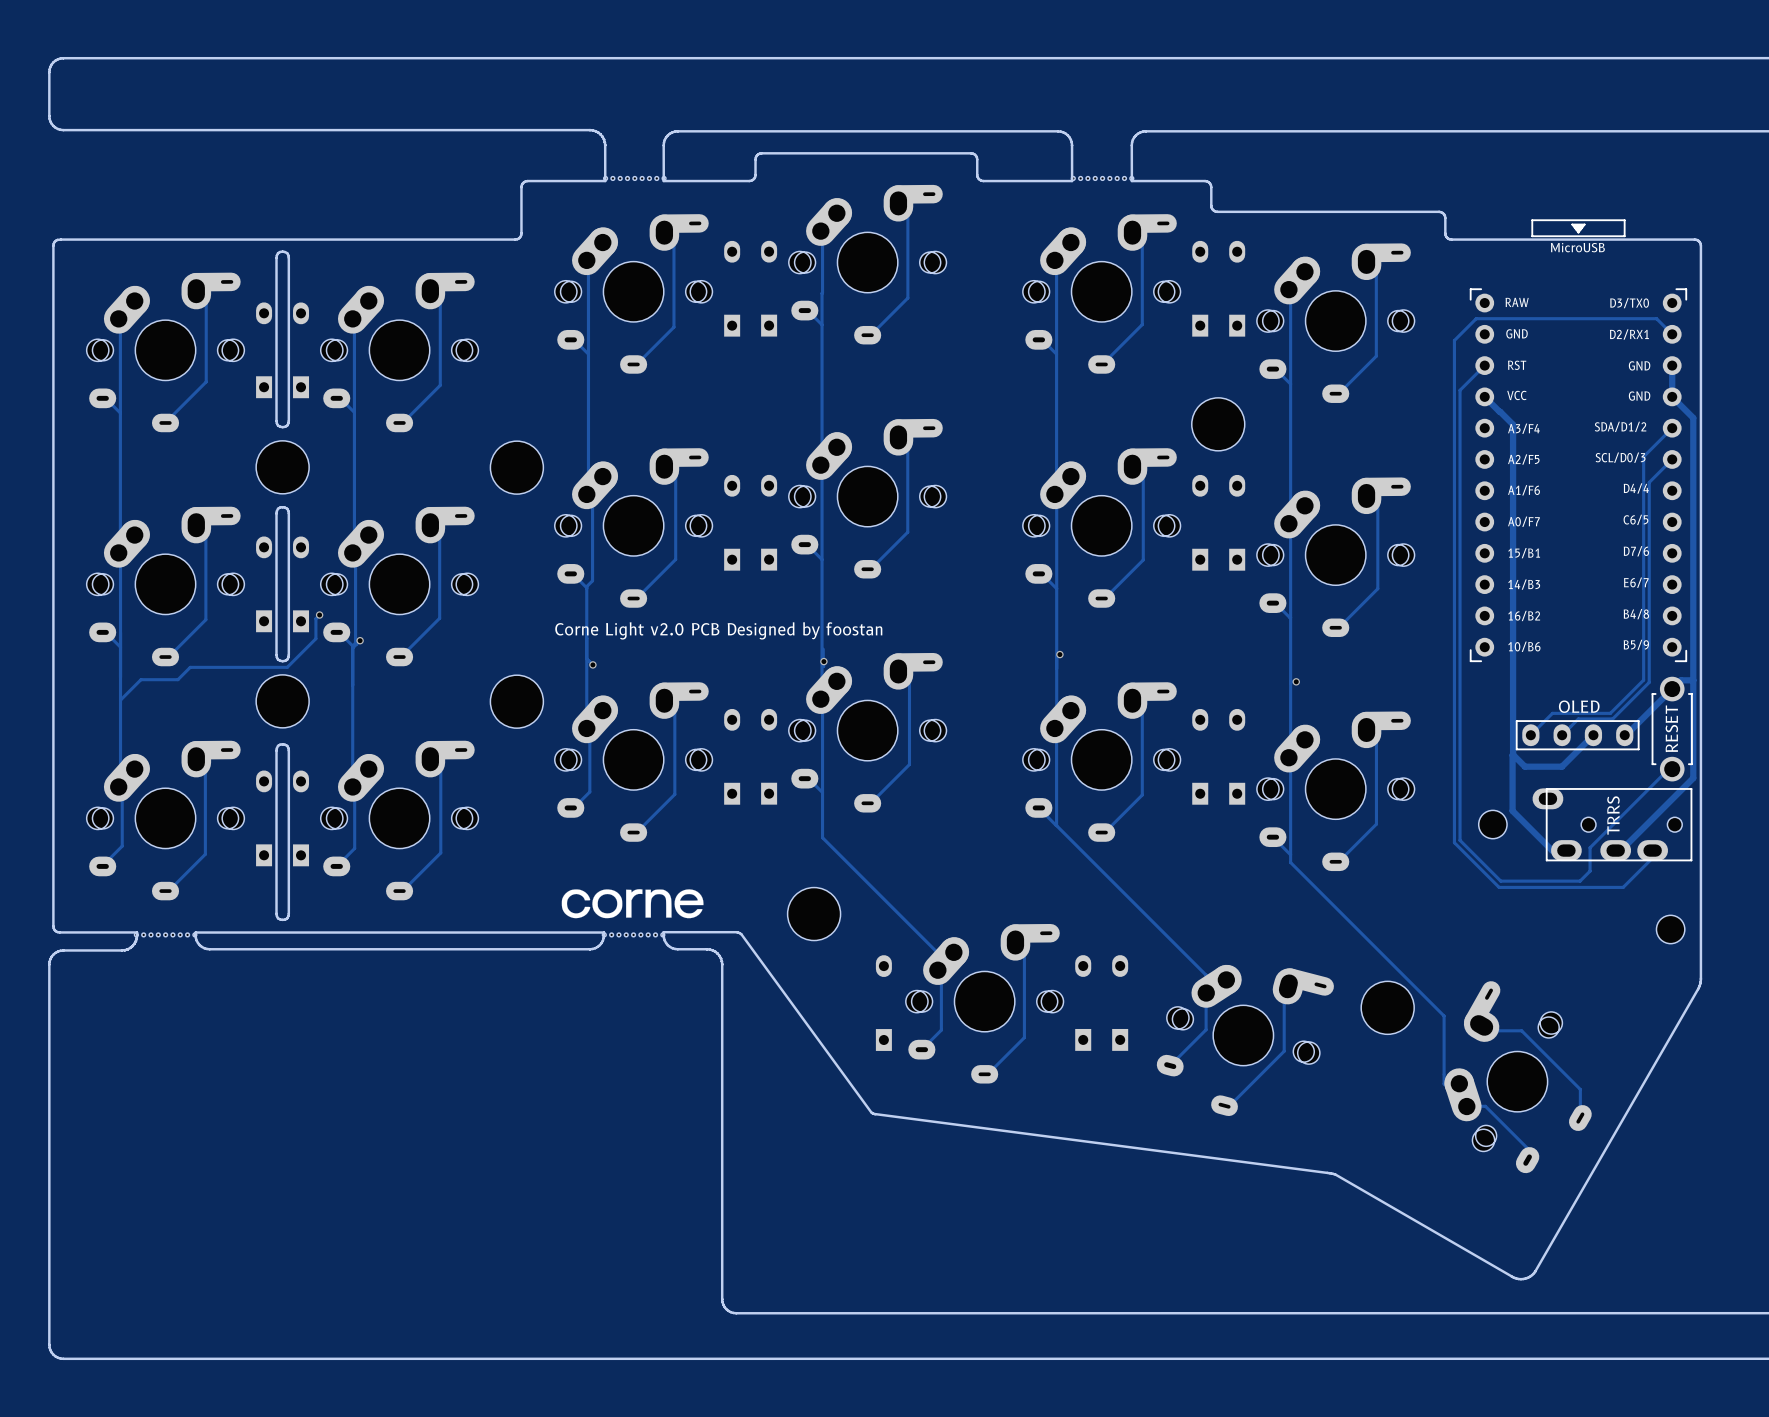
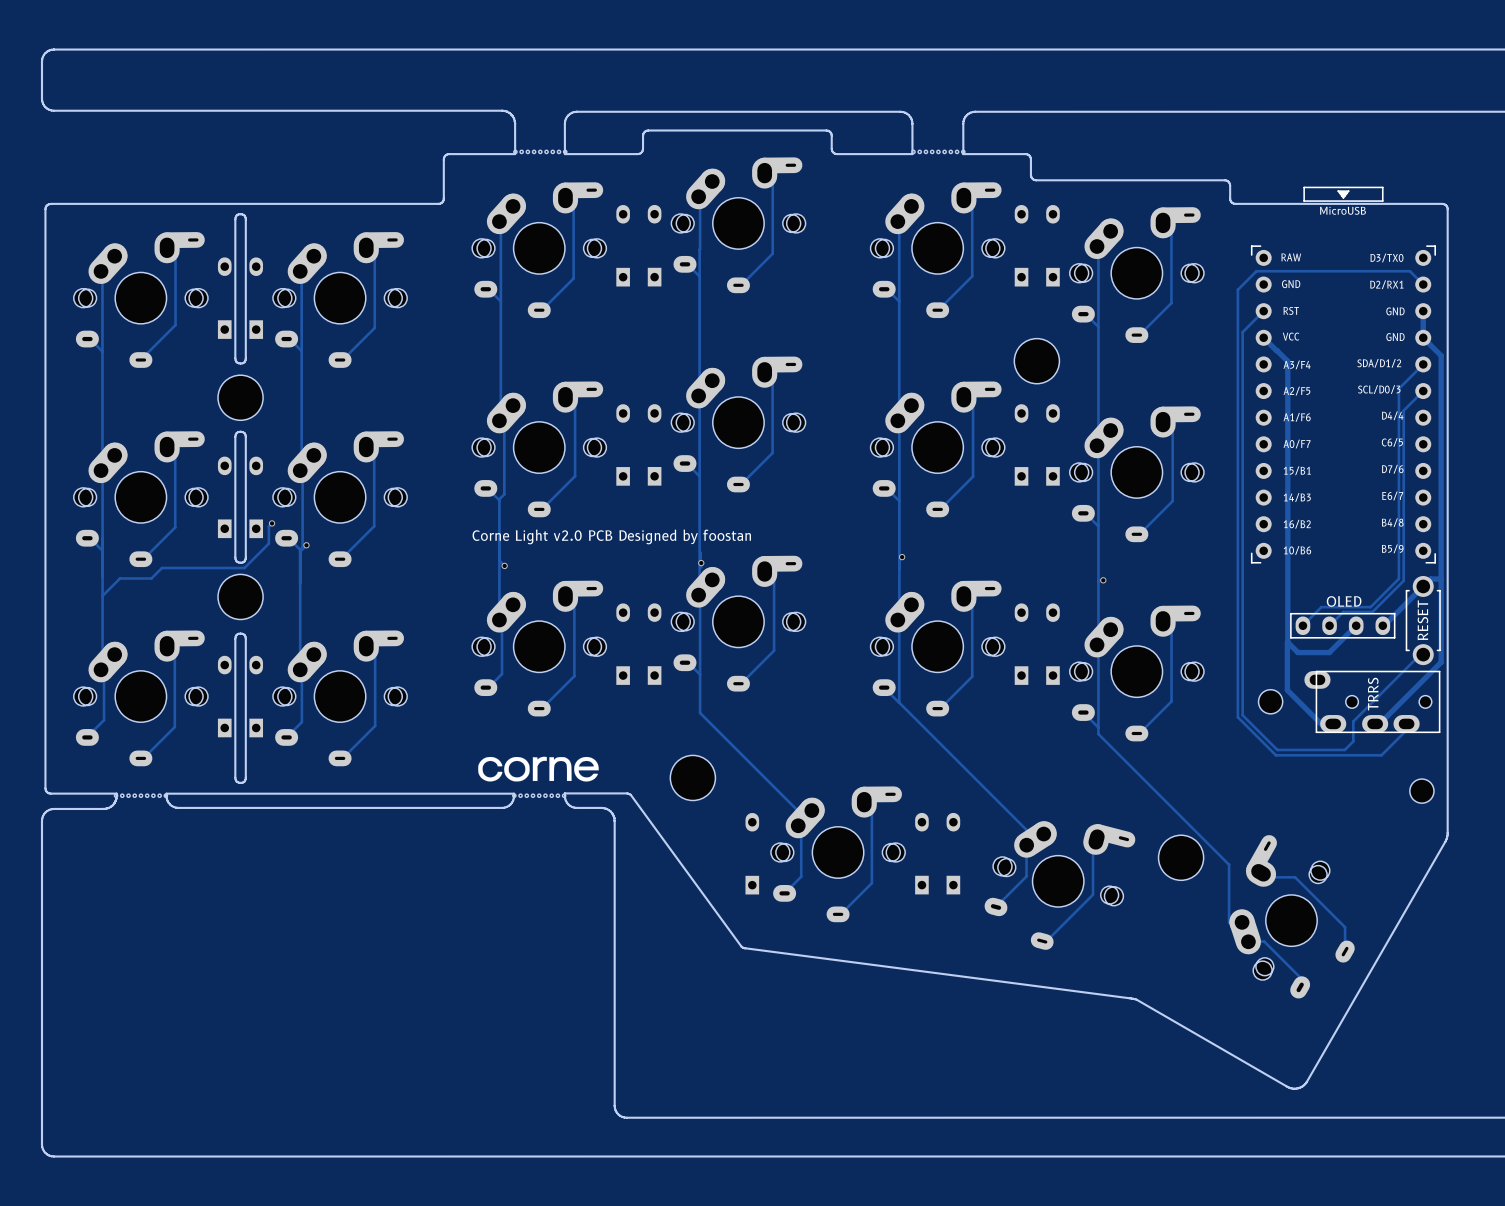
part: (516, 467) -> none
part: (516, 701) -> none

